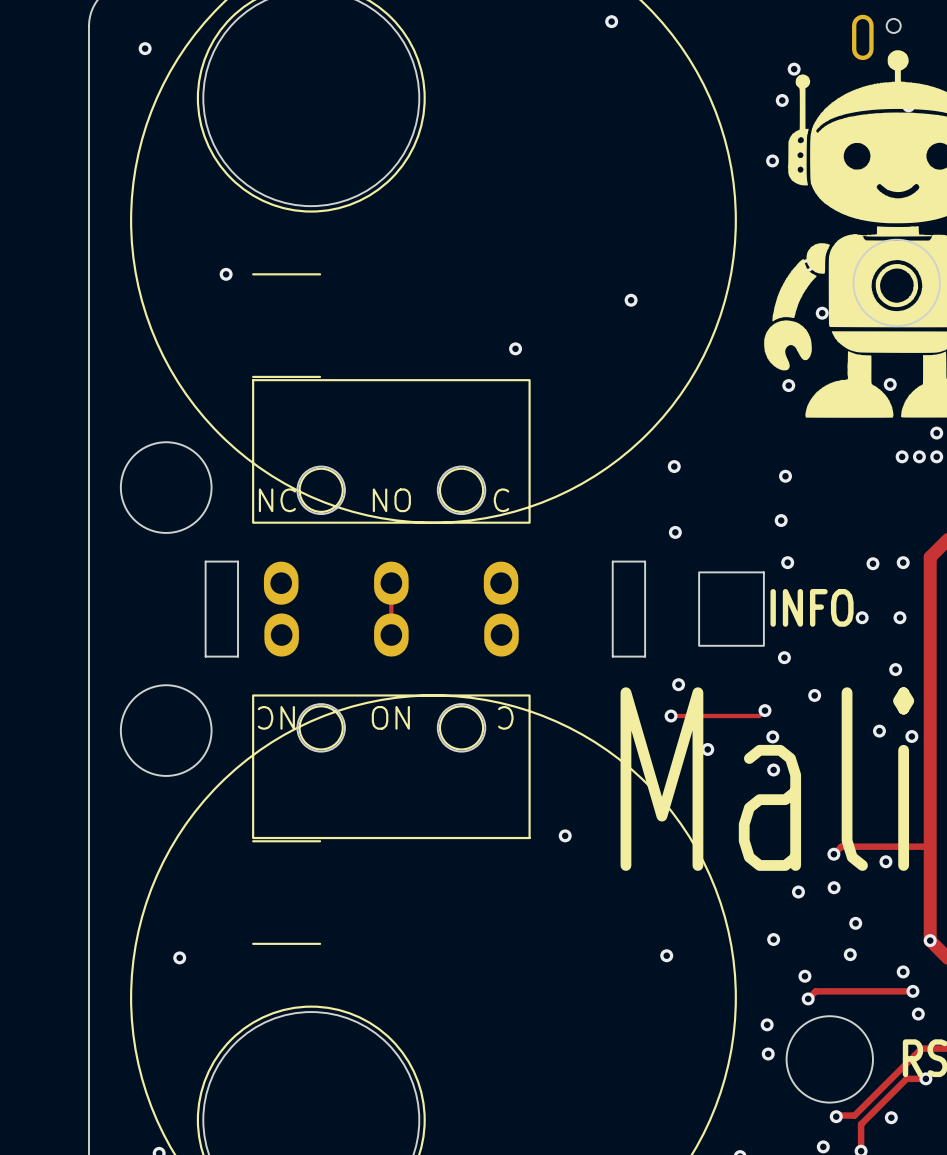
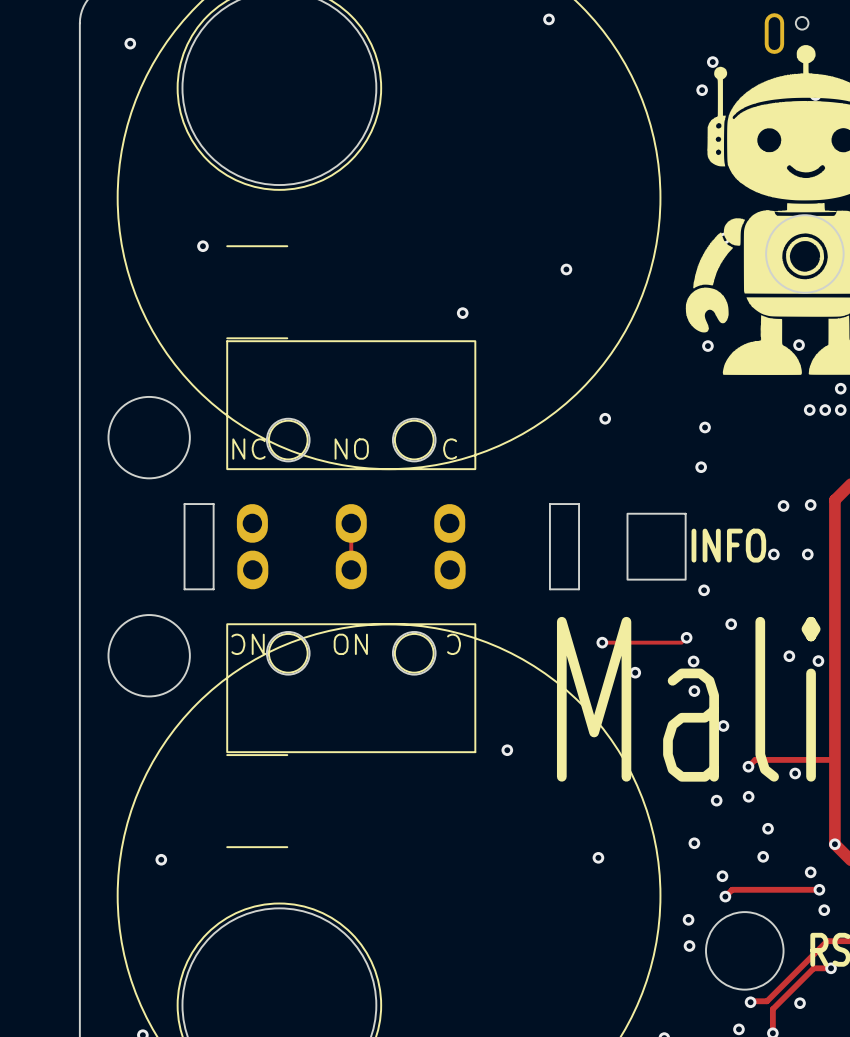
via: (772, 160) -> none
via: (822, 313) -> none
via: (675, 532) -> none
via: (787, 562) -> none
via: (895, 669) -> none
via: (678, 684) -> none
via: none -> (723, 726)

